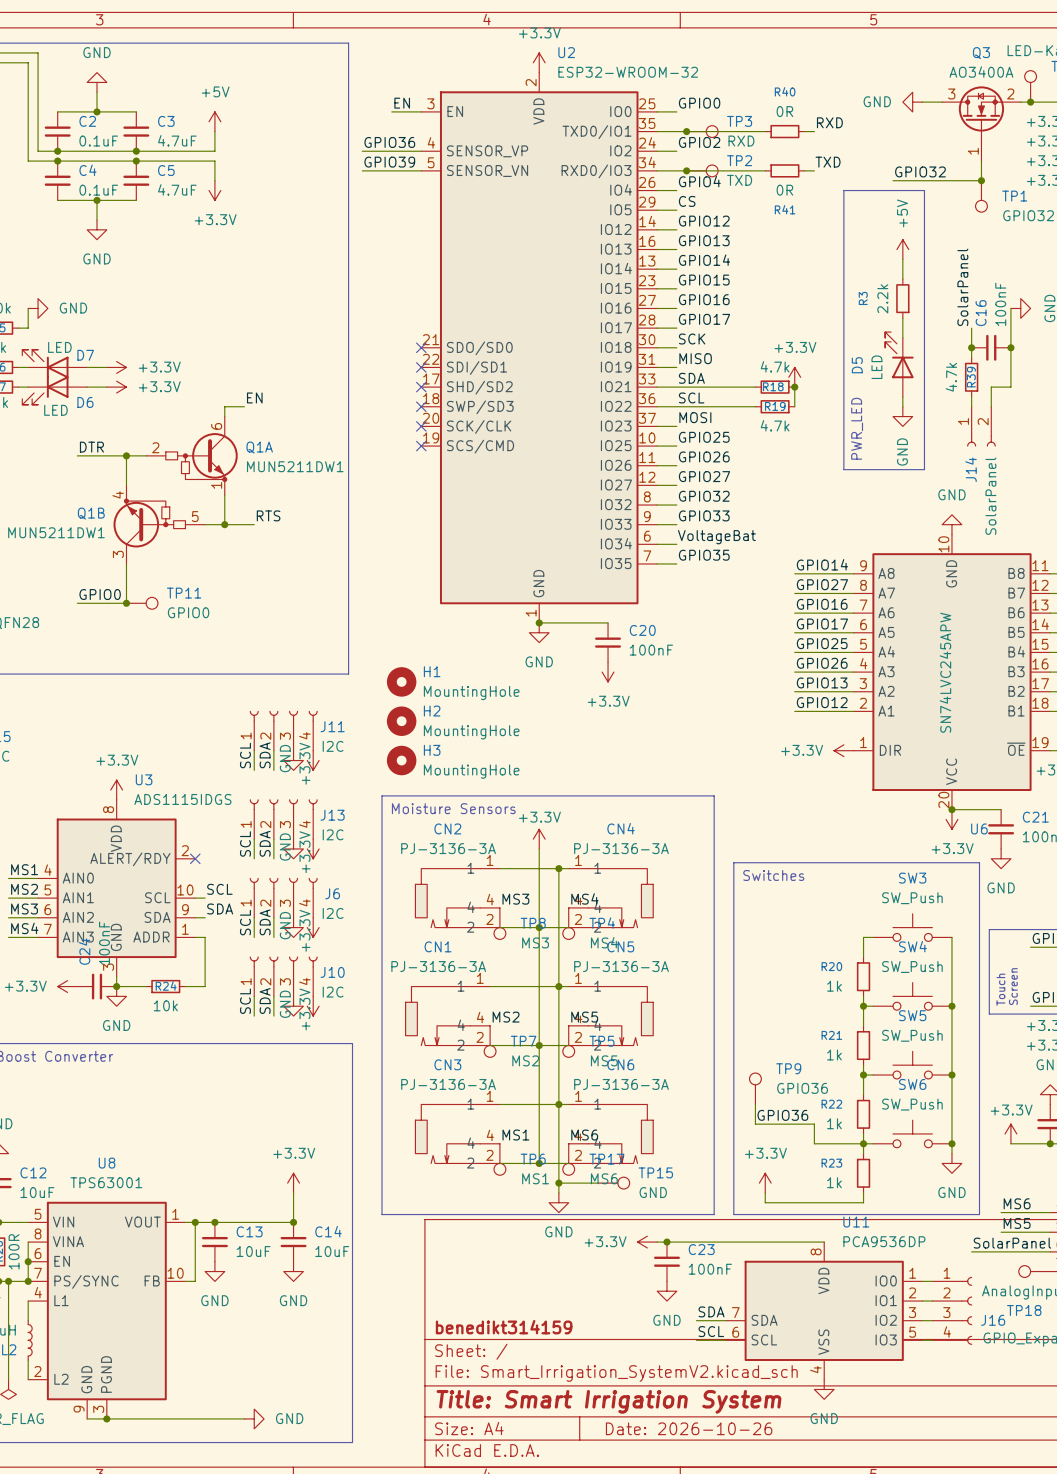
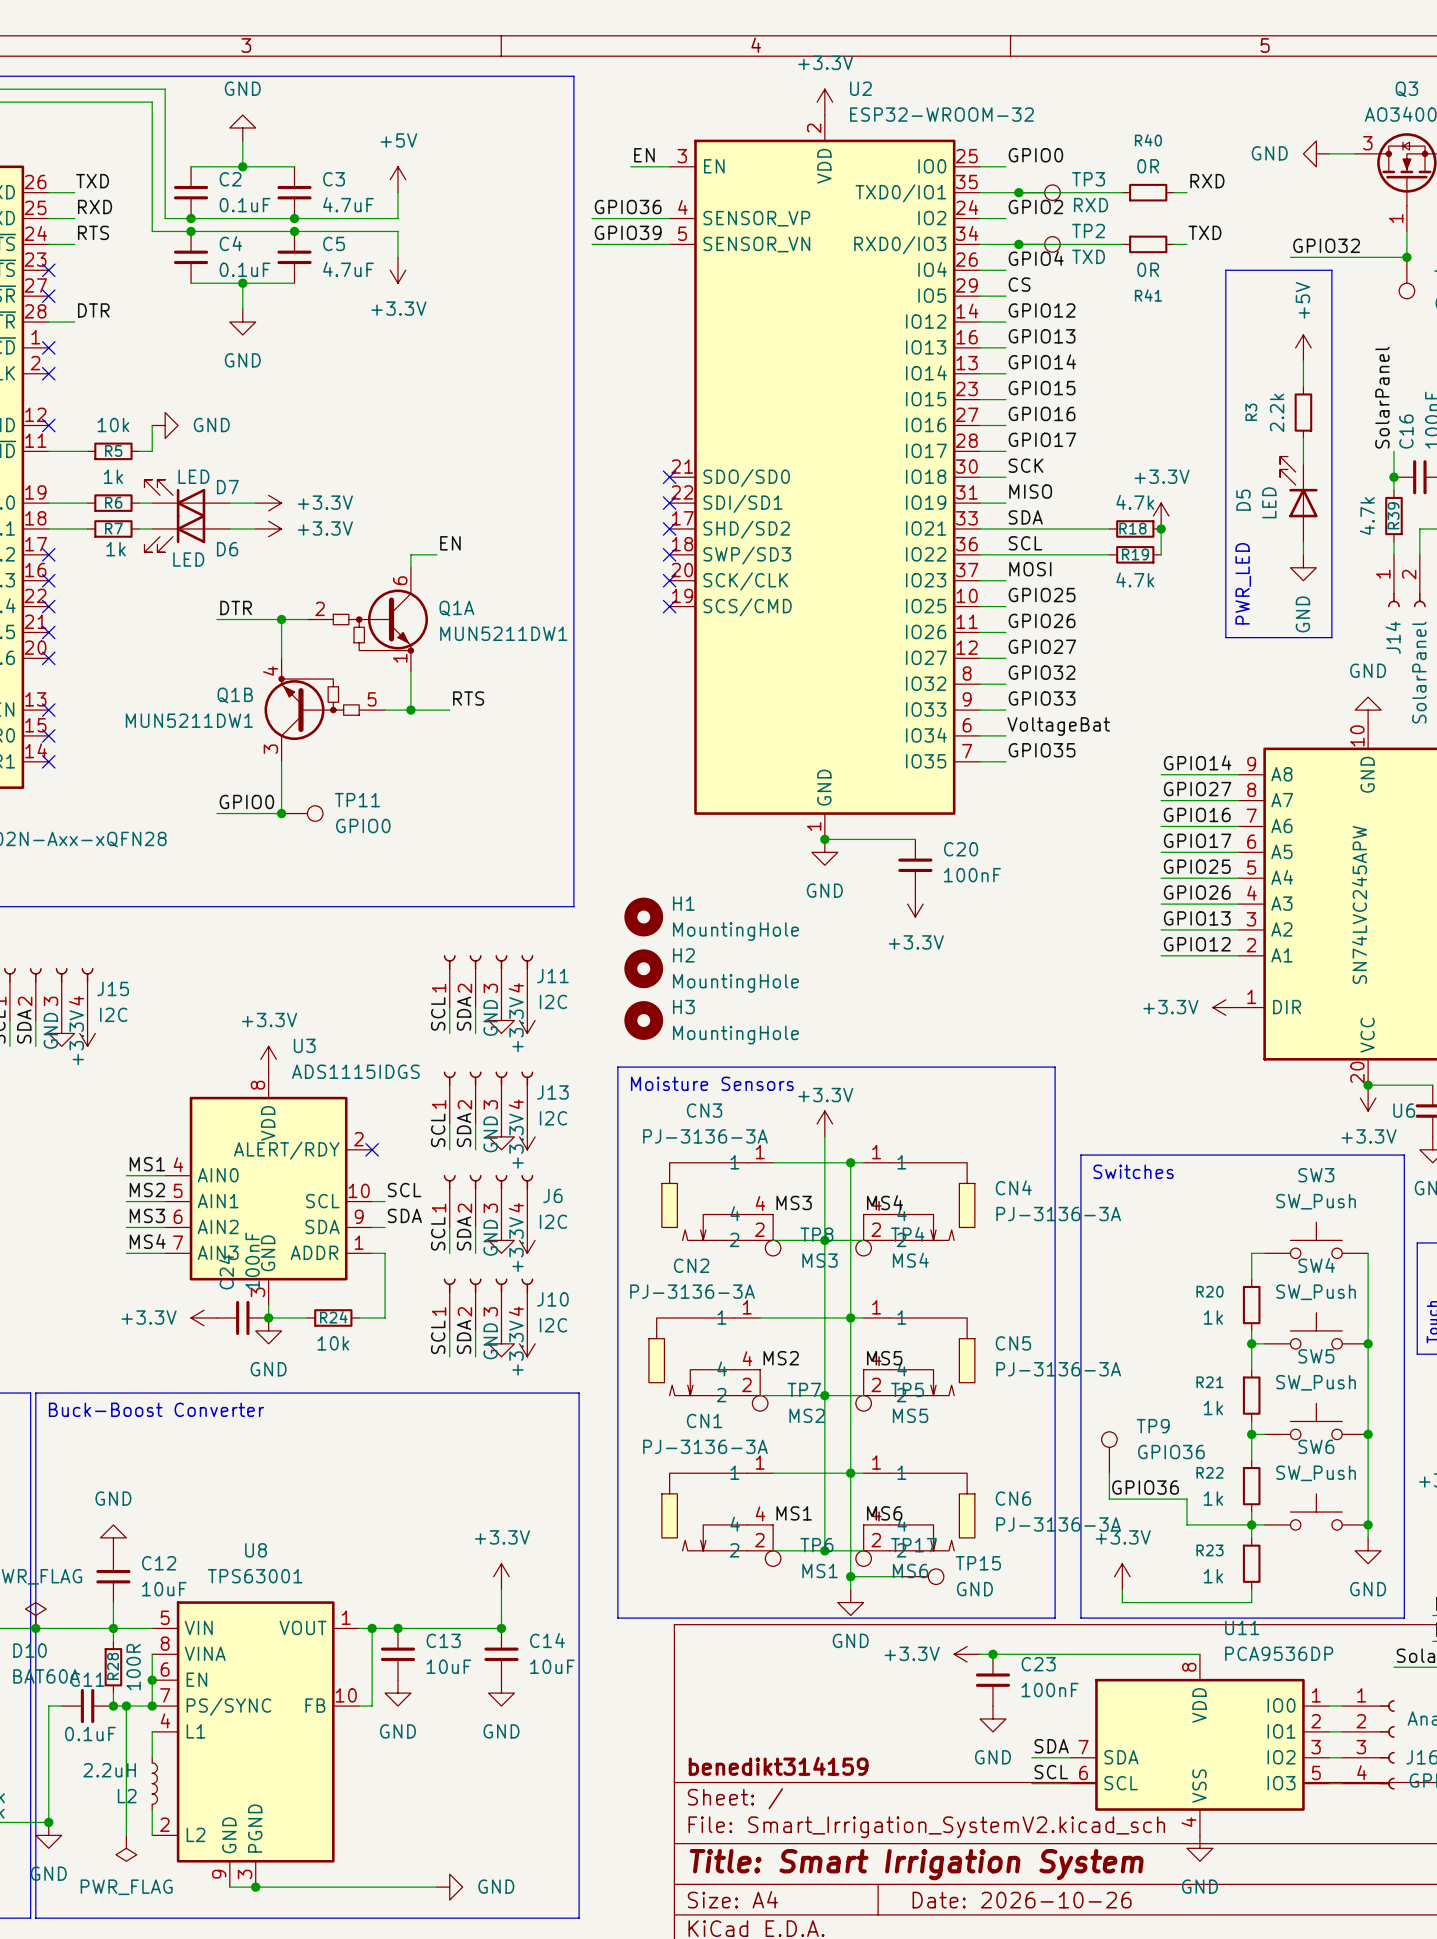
CN2 name: CN2 (447, 828) -> CN3 (704, 1110)
CN4 name position: CN4 (621, 828) -> CN4 (1013, 1187)
CN4 value position: PJ-3136-3A (621, 848) -> PJ-3136-3A (1058, 1214)
CN1 name: CN1 (438, 946) -> CN2 (691, 1265)
CN5 name position: CN5 (620, 946) -> CN5 (1013, 1343)
CN5 value position: PJ-3136-3A (621, 966) -> PJ-3136-3A (1058, 1369)
CN3 name: CN3 (447, 1064) -> CN1 (704, 1420)
CN6 name position: CN6 (620, 1064) -> CN6 (1013, 1498)
CN6 value position: PJ-3136-3A (621, 1084) -> PJ-3136-3A (1058, 1524)

